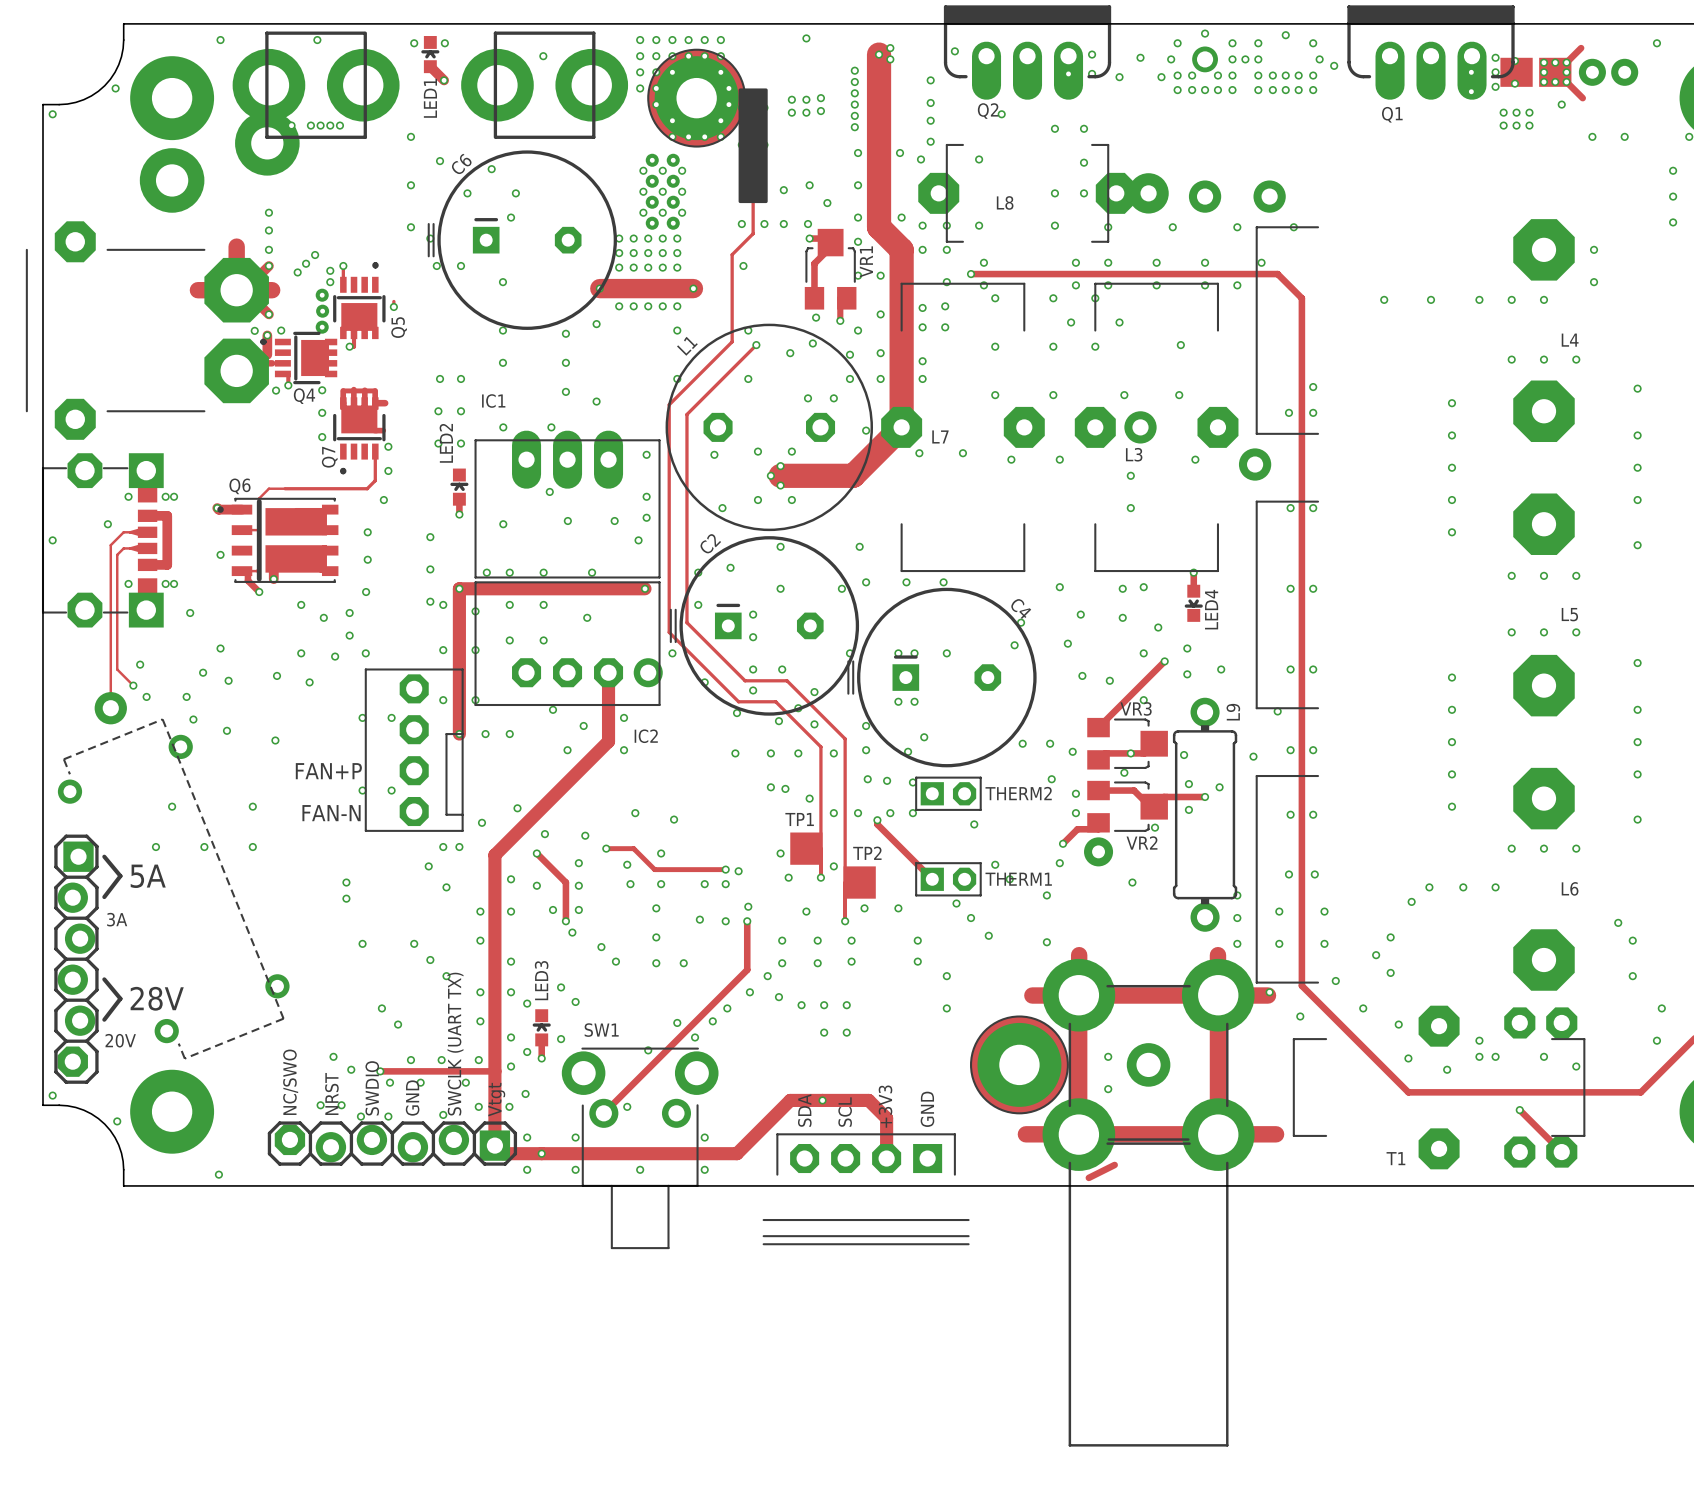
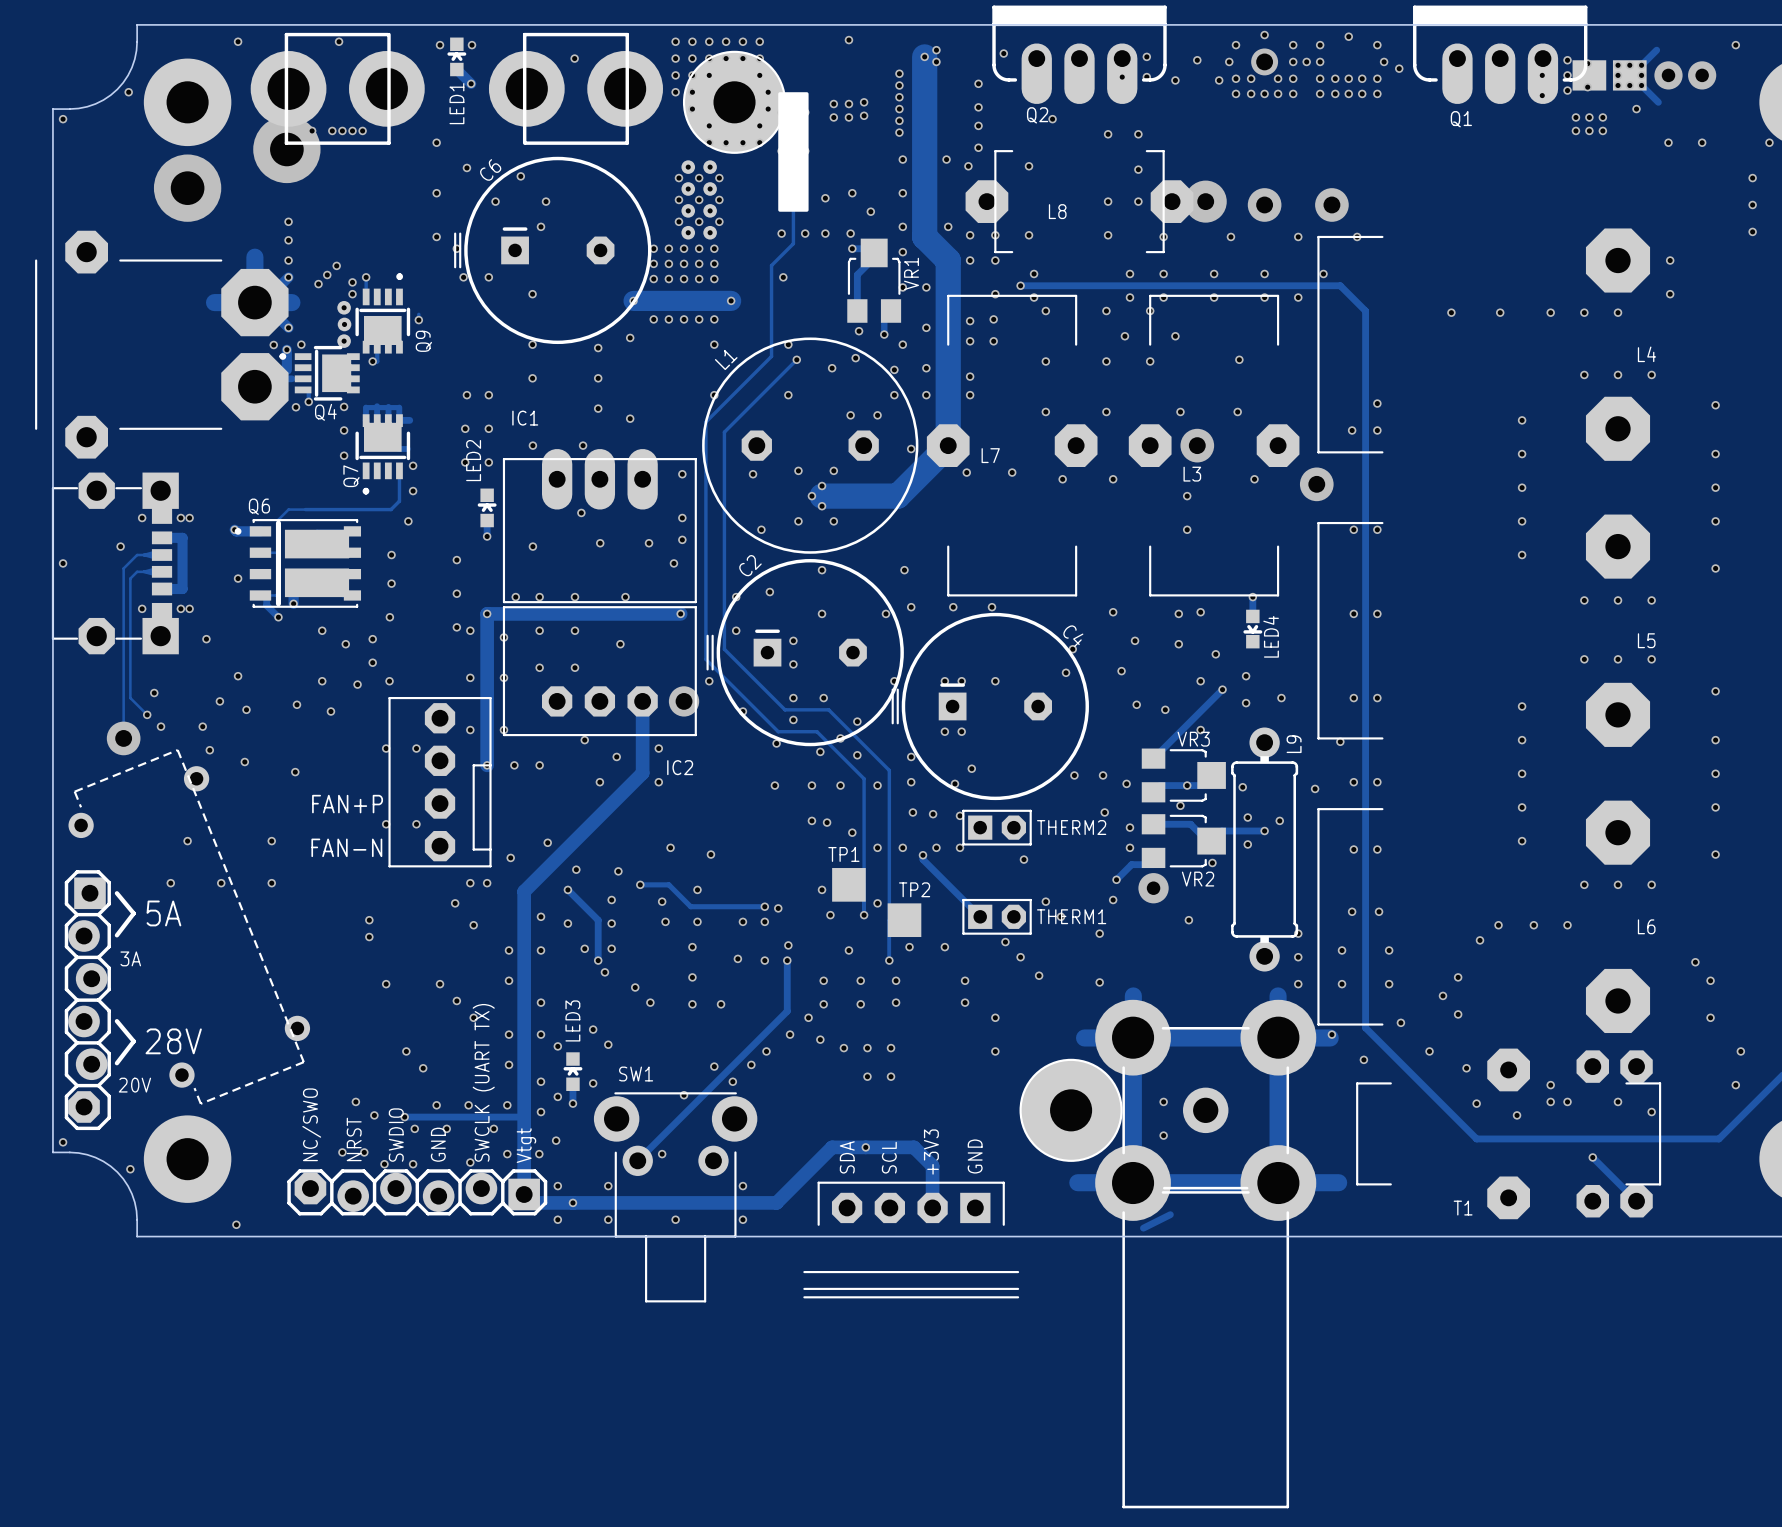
Q5 name: Q5 (399, 327) -> Q9 (423, 341)

